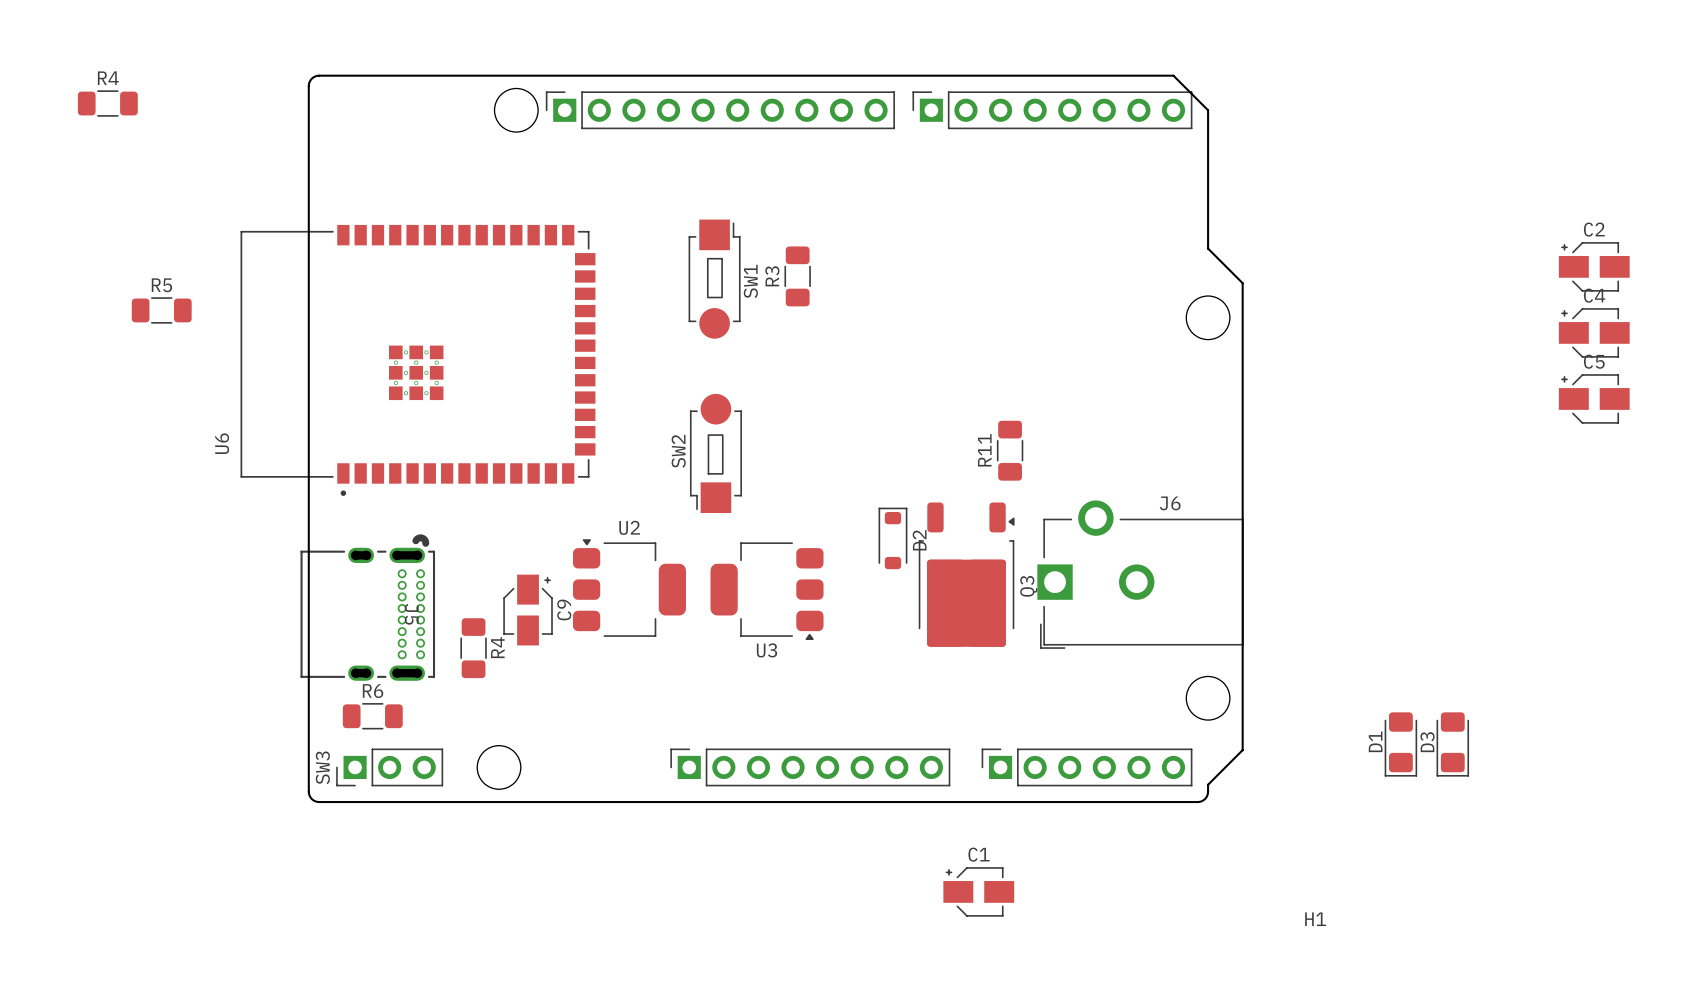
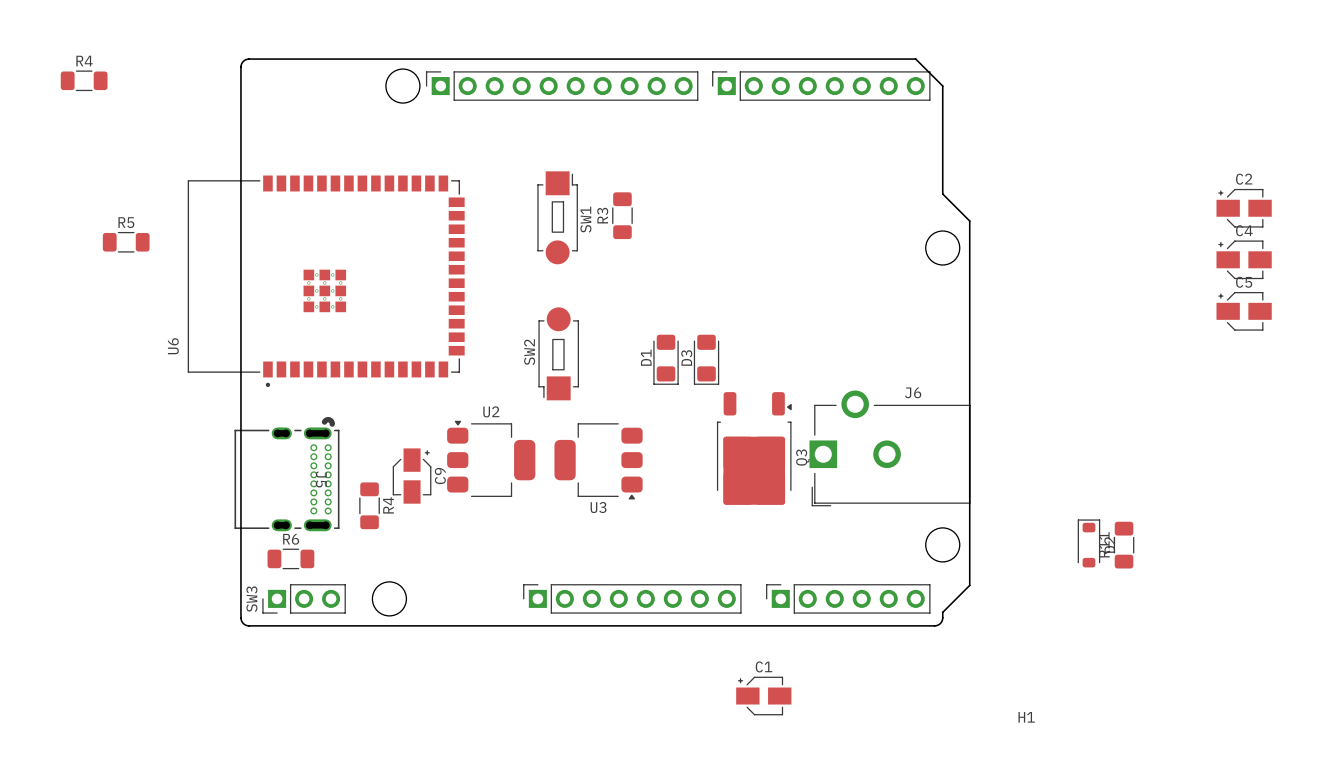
R11 position: (1010, 450) -> (1124, 545)
D2 position: (892, 538) -> (1088, 543)
D1 position: (1400, 744) -> (666, 359)
D3 position: (1452, 744) -> (706, 359)

